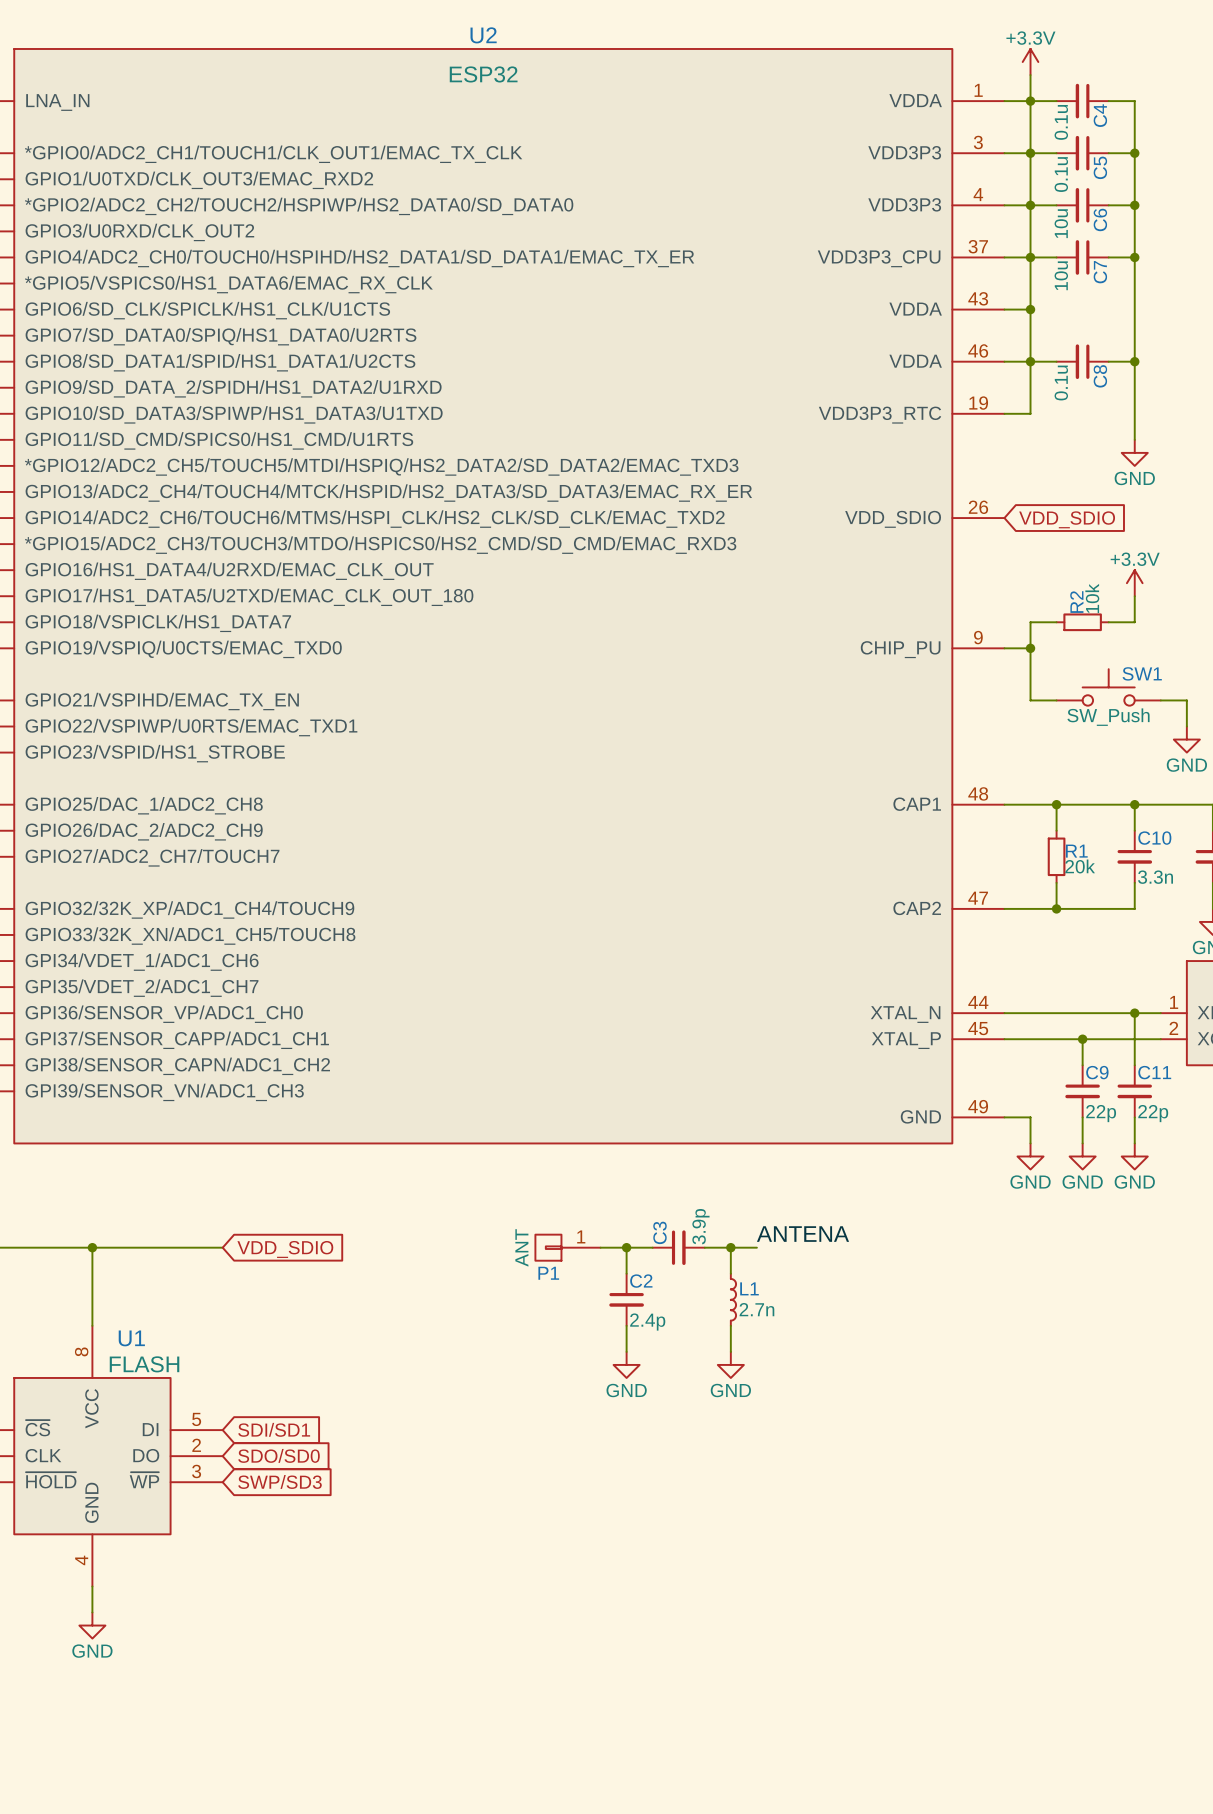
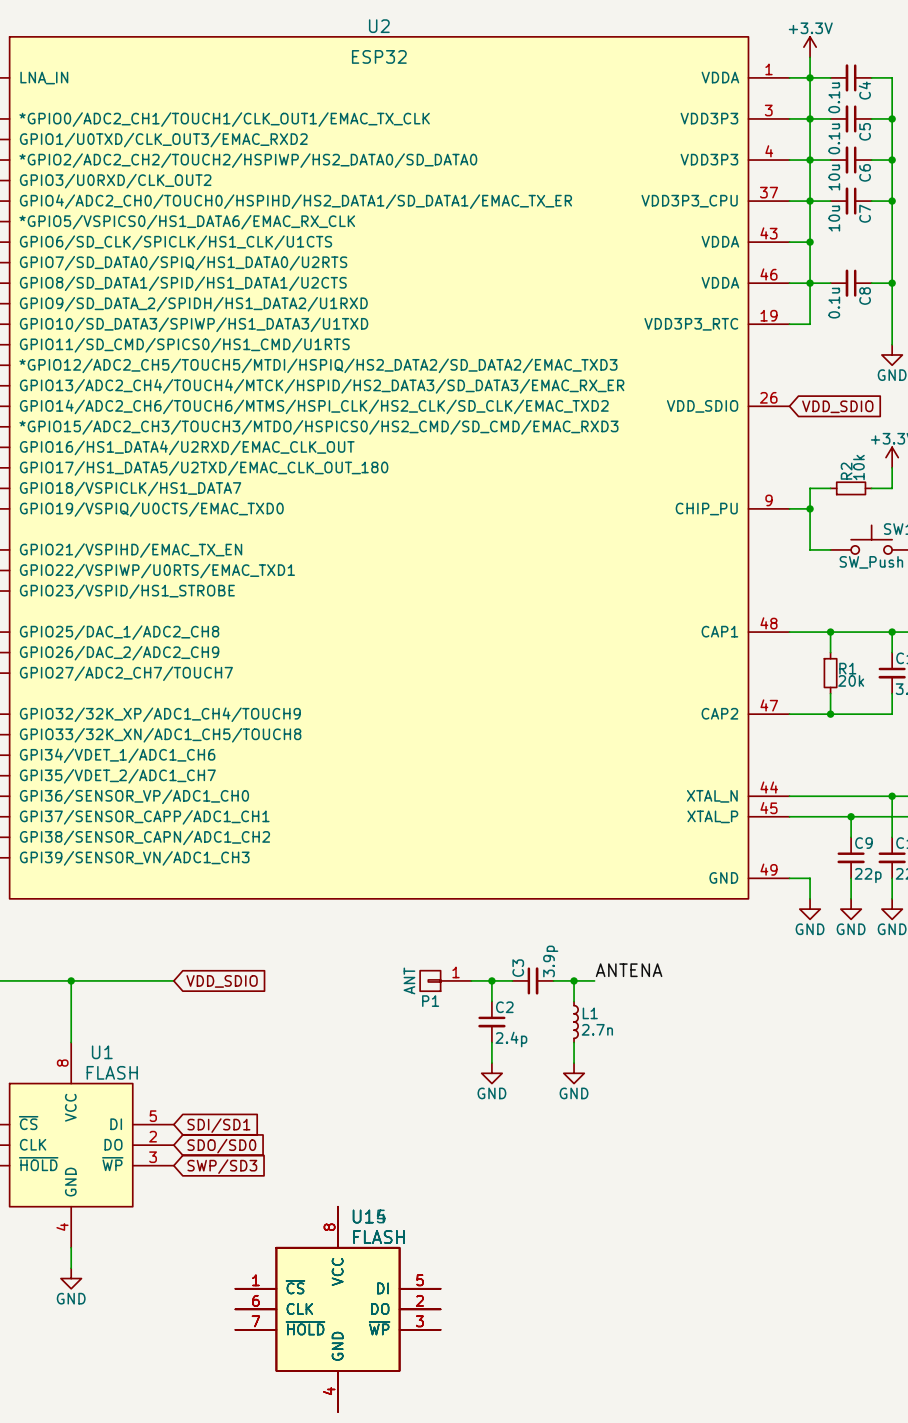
part: none -> FLASH (338, 1309)
part: none -> FLASH (338, 1309)

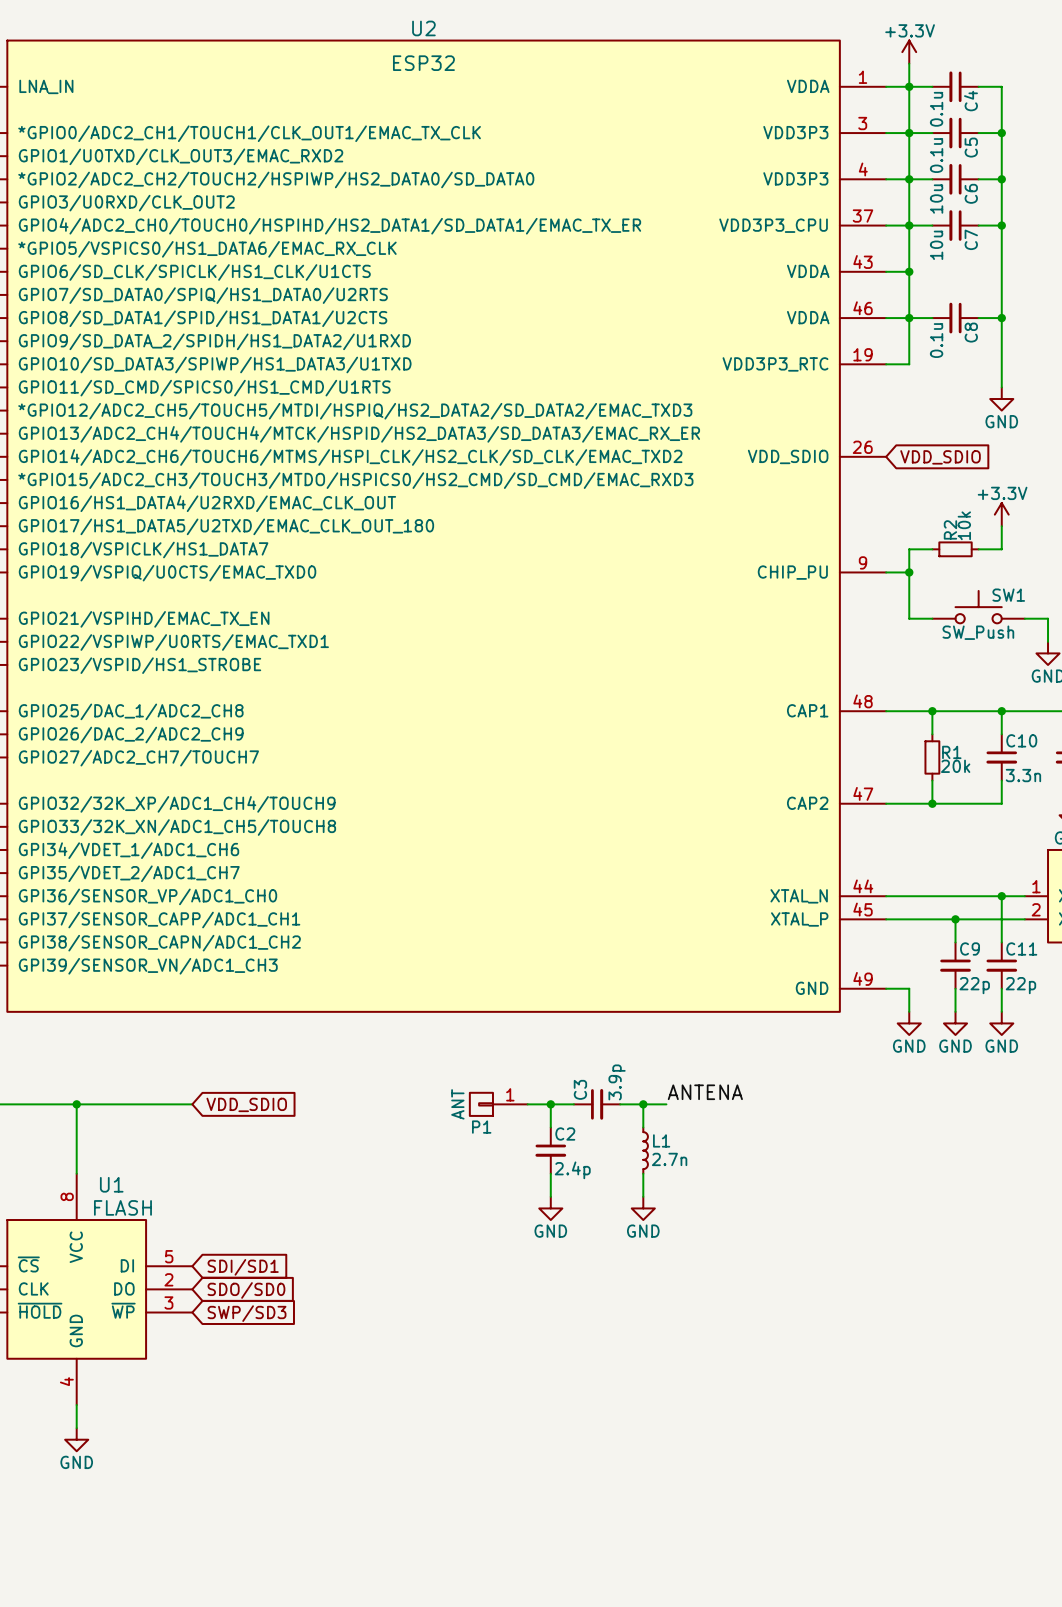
part: FLASH (338, 1309) -> none
part: FLASH (338, 1309) -> none

